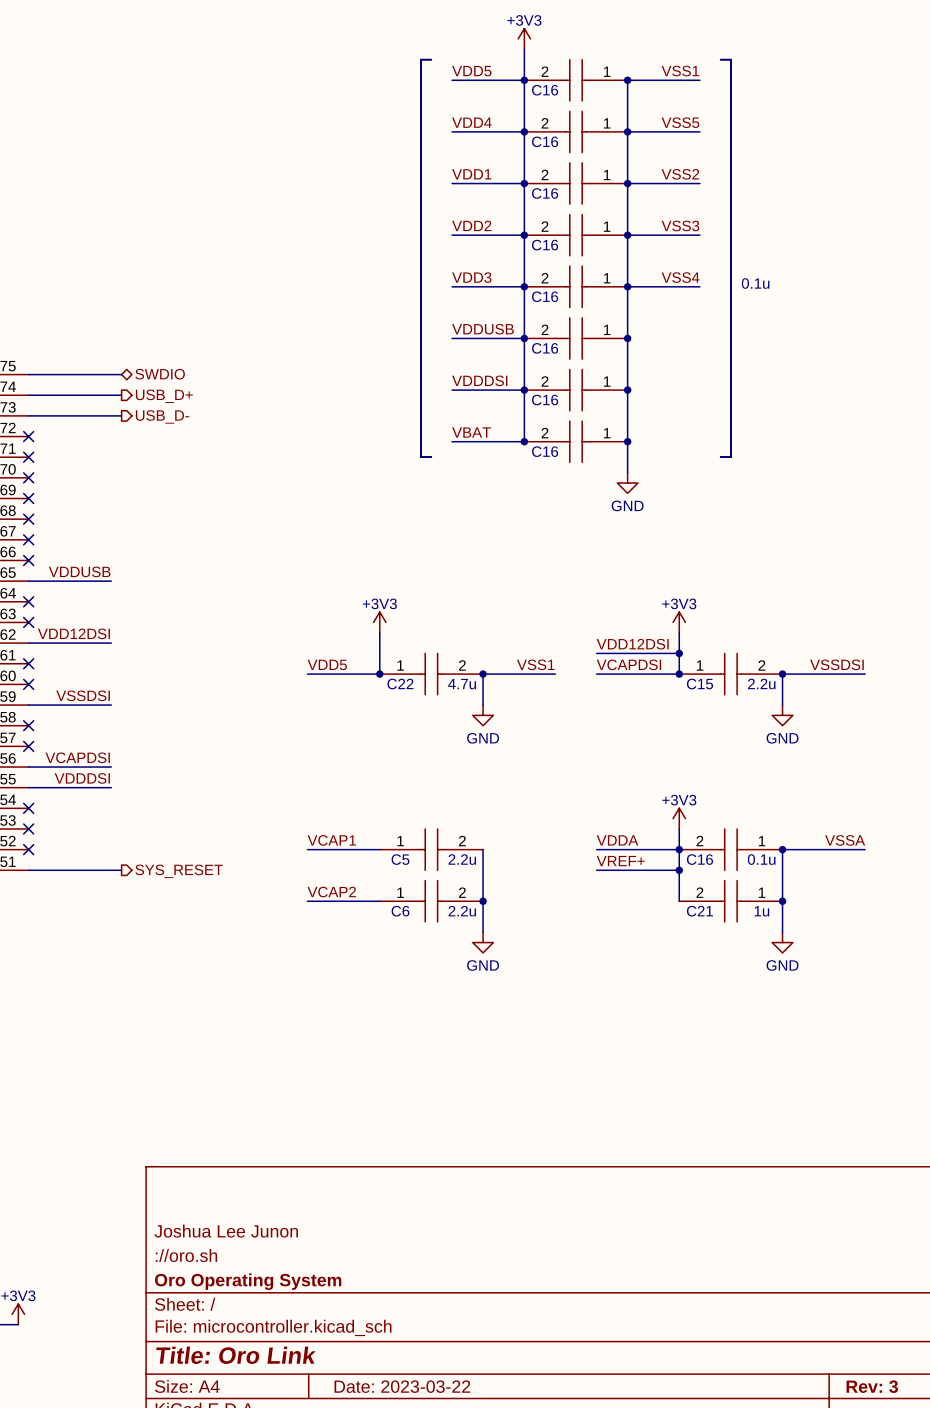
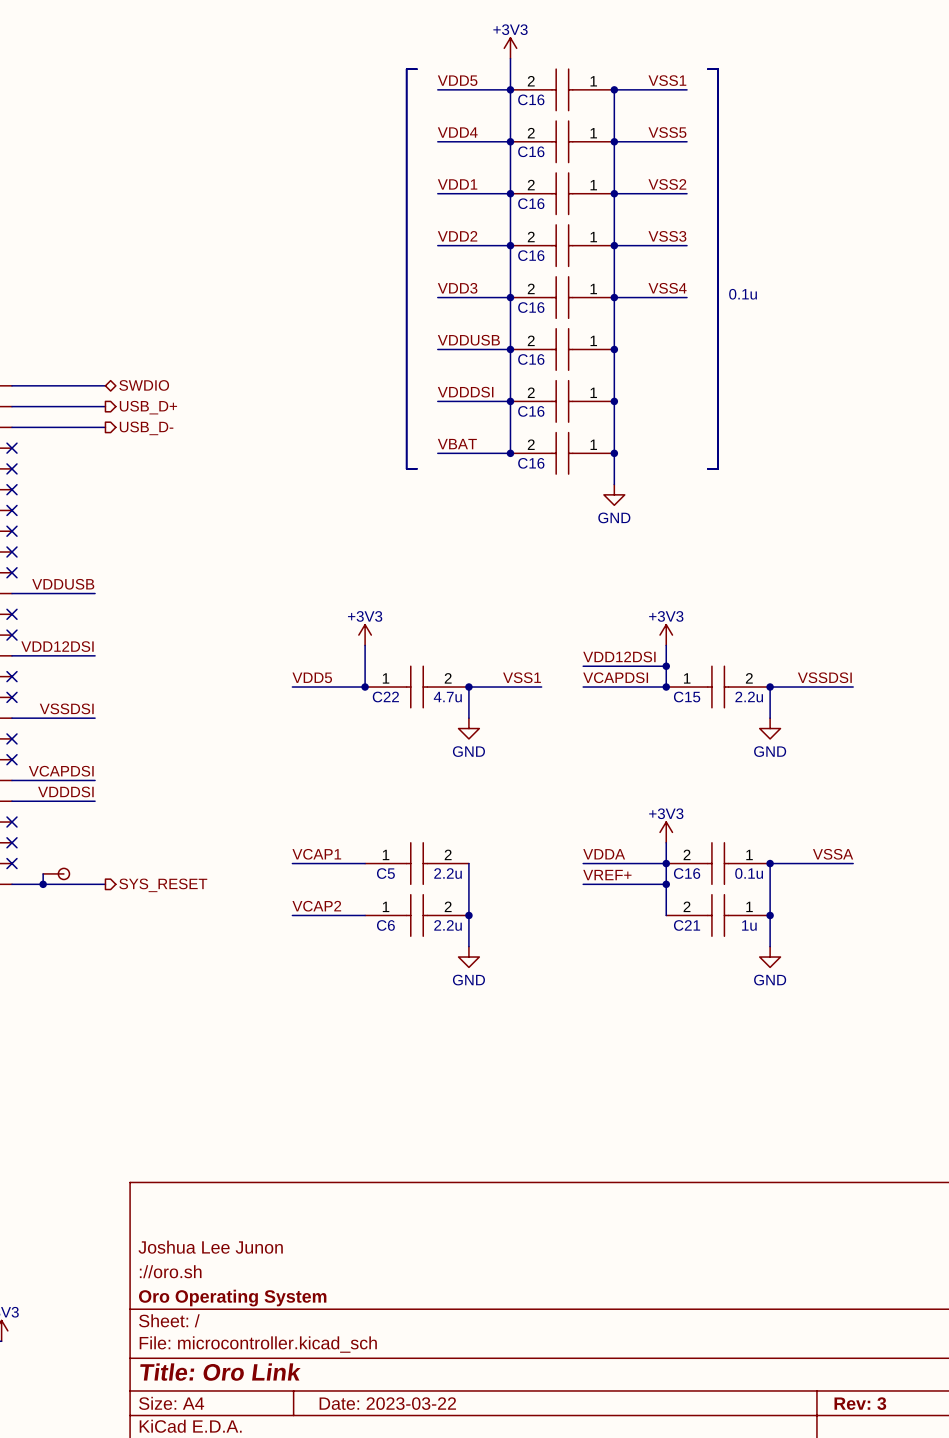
wire: none -> (43, 873) (43, 884)
part: none -> (56, 873)
junction: none -> (43, 884)

